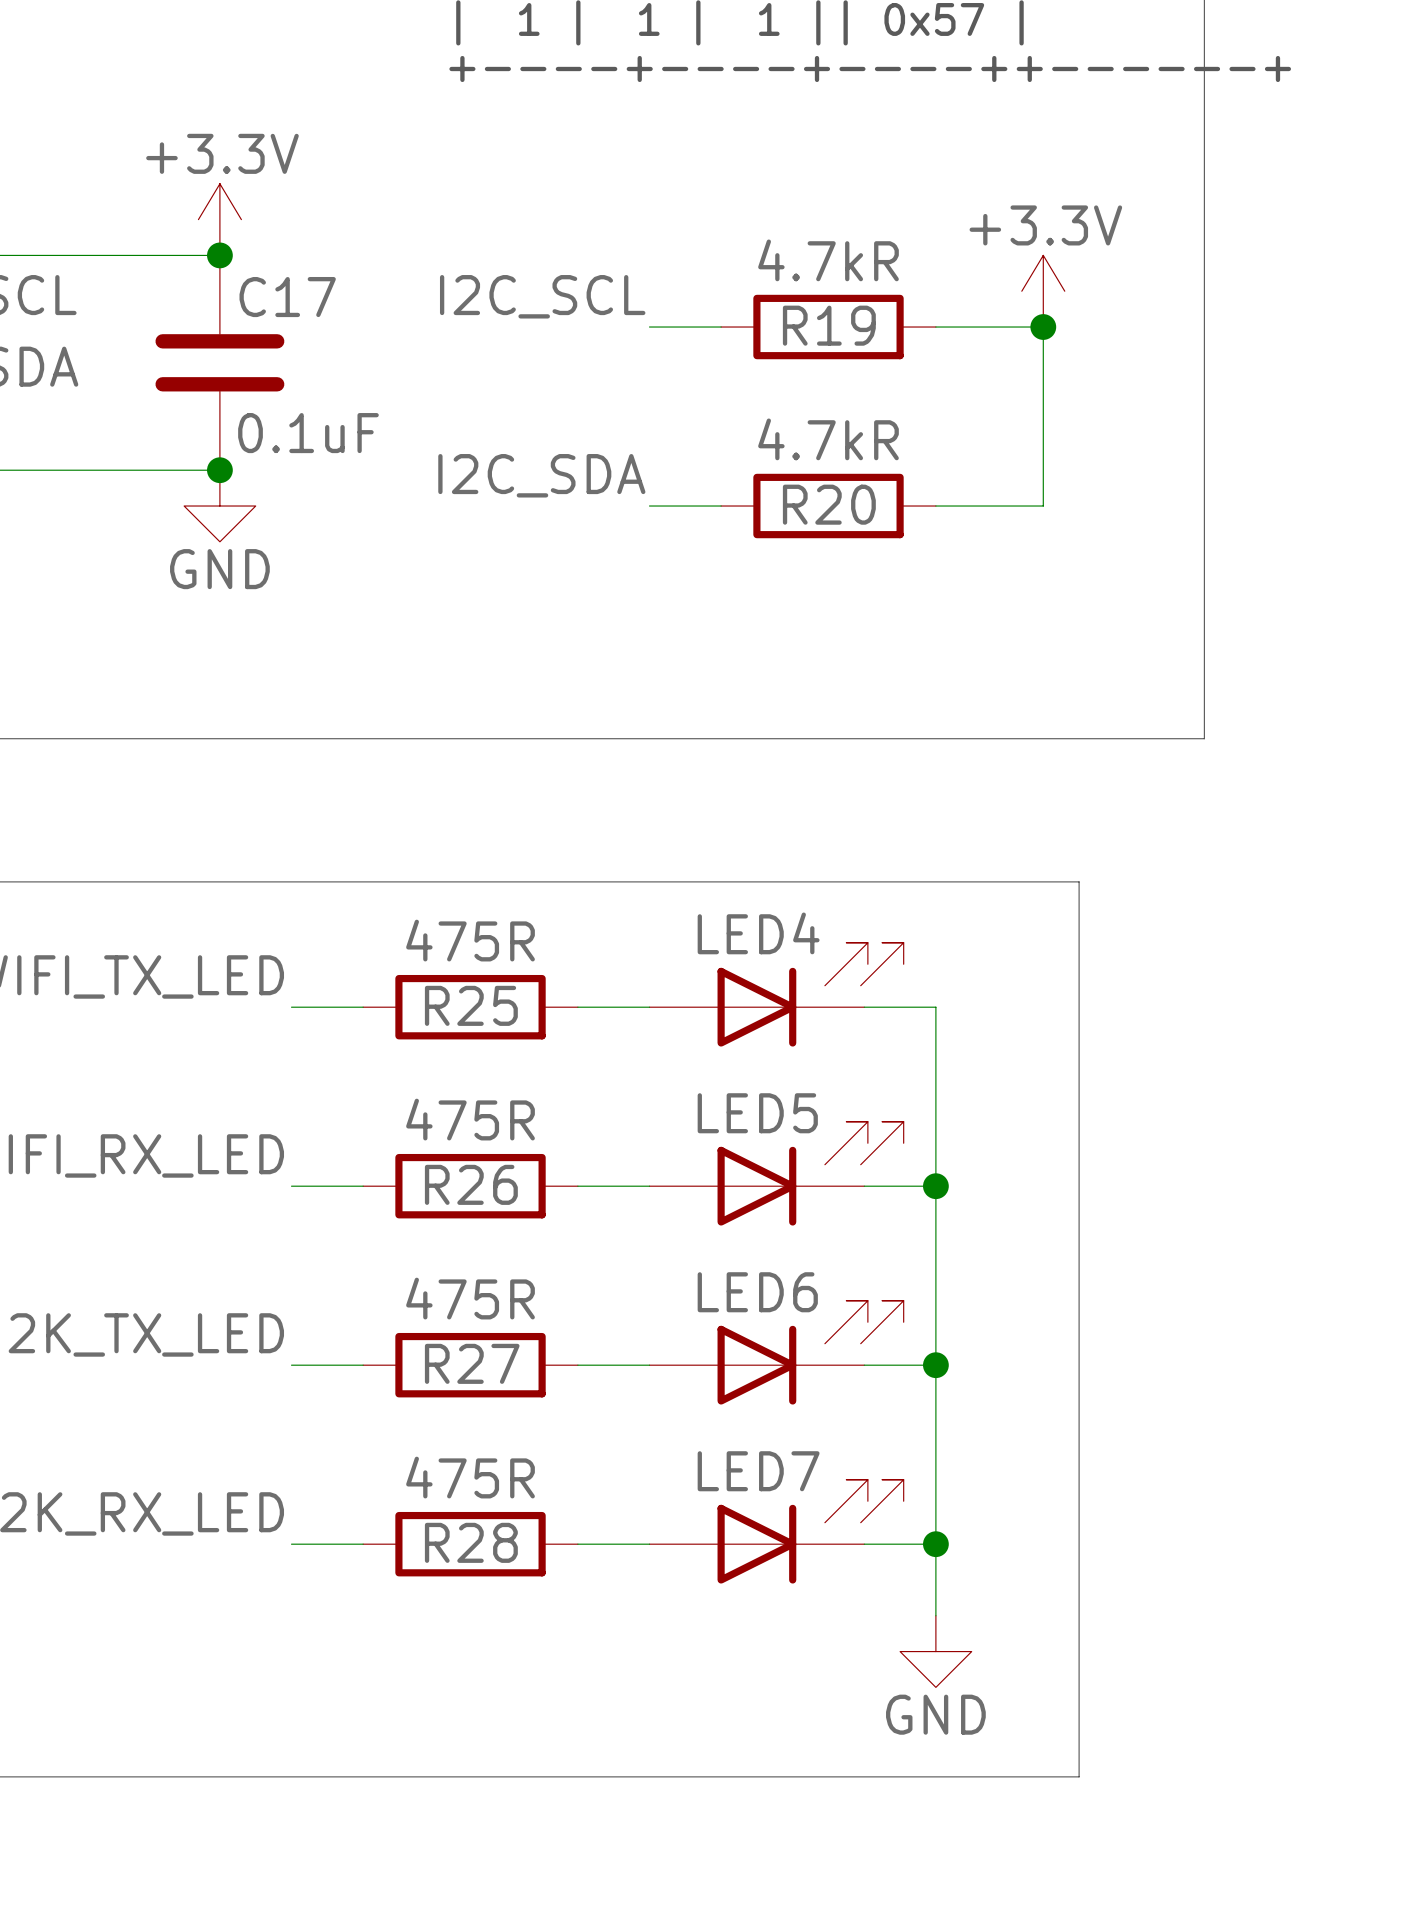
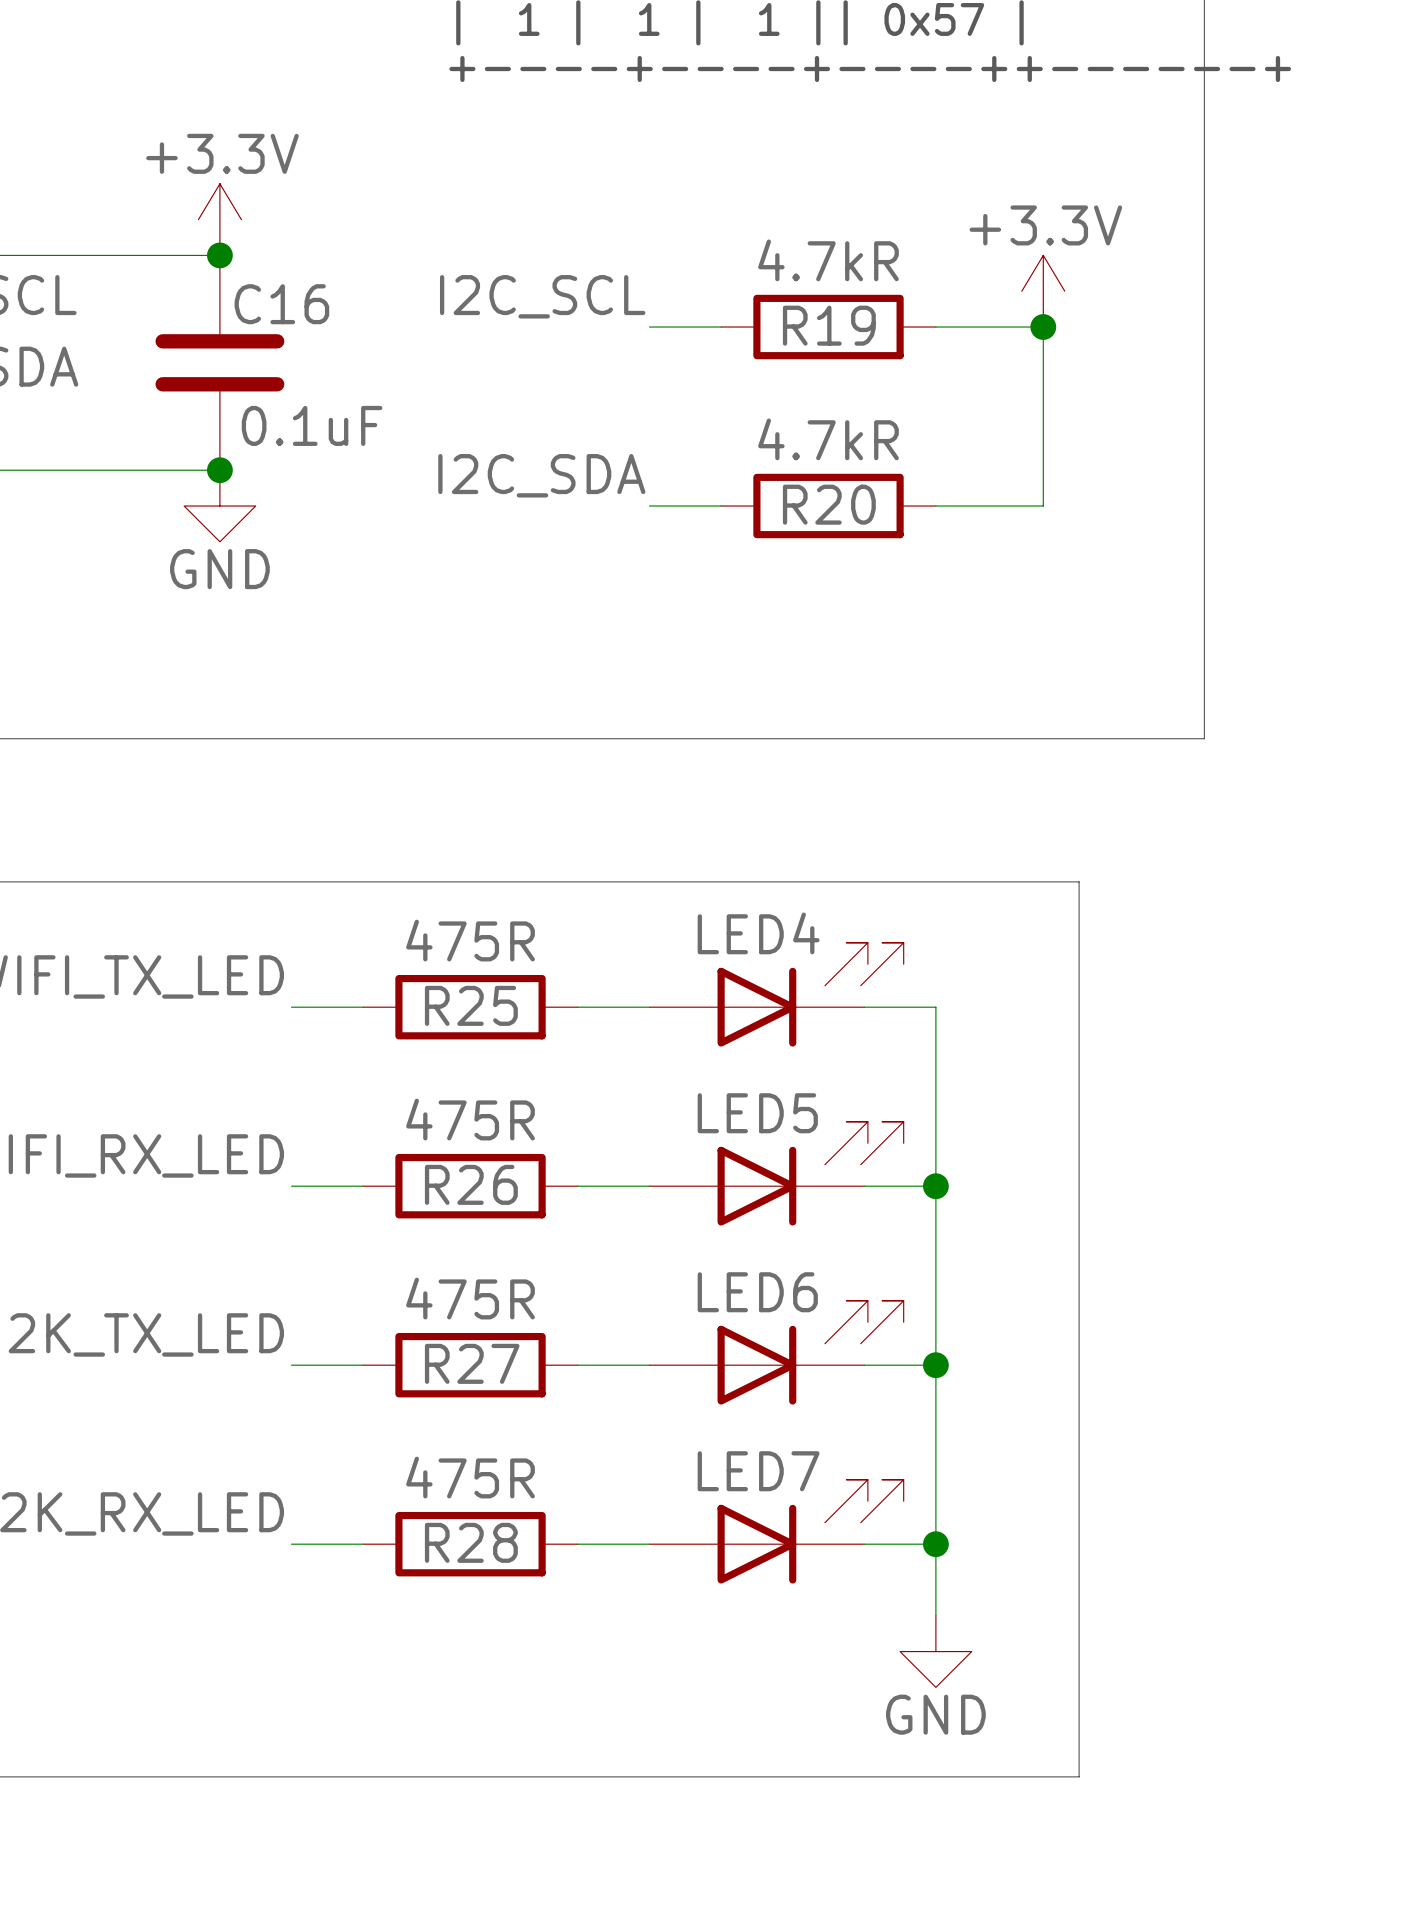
C17 name: C17 (287, 297) -> C16 (281, 304)
C17 value position: 0.1uF (308, 433) -> 0.1uF (312, 425)

